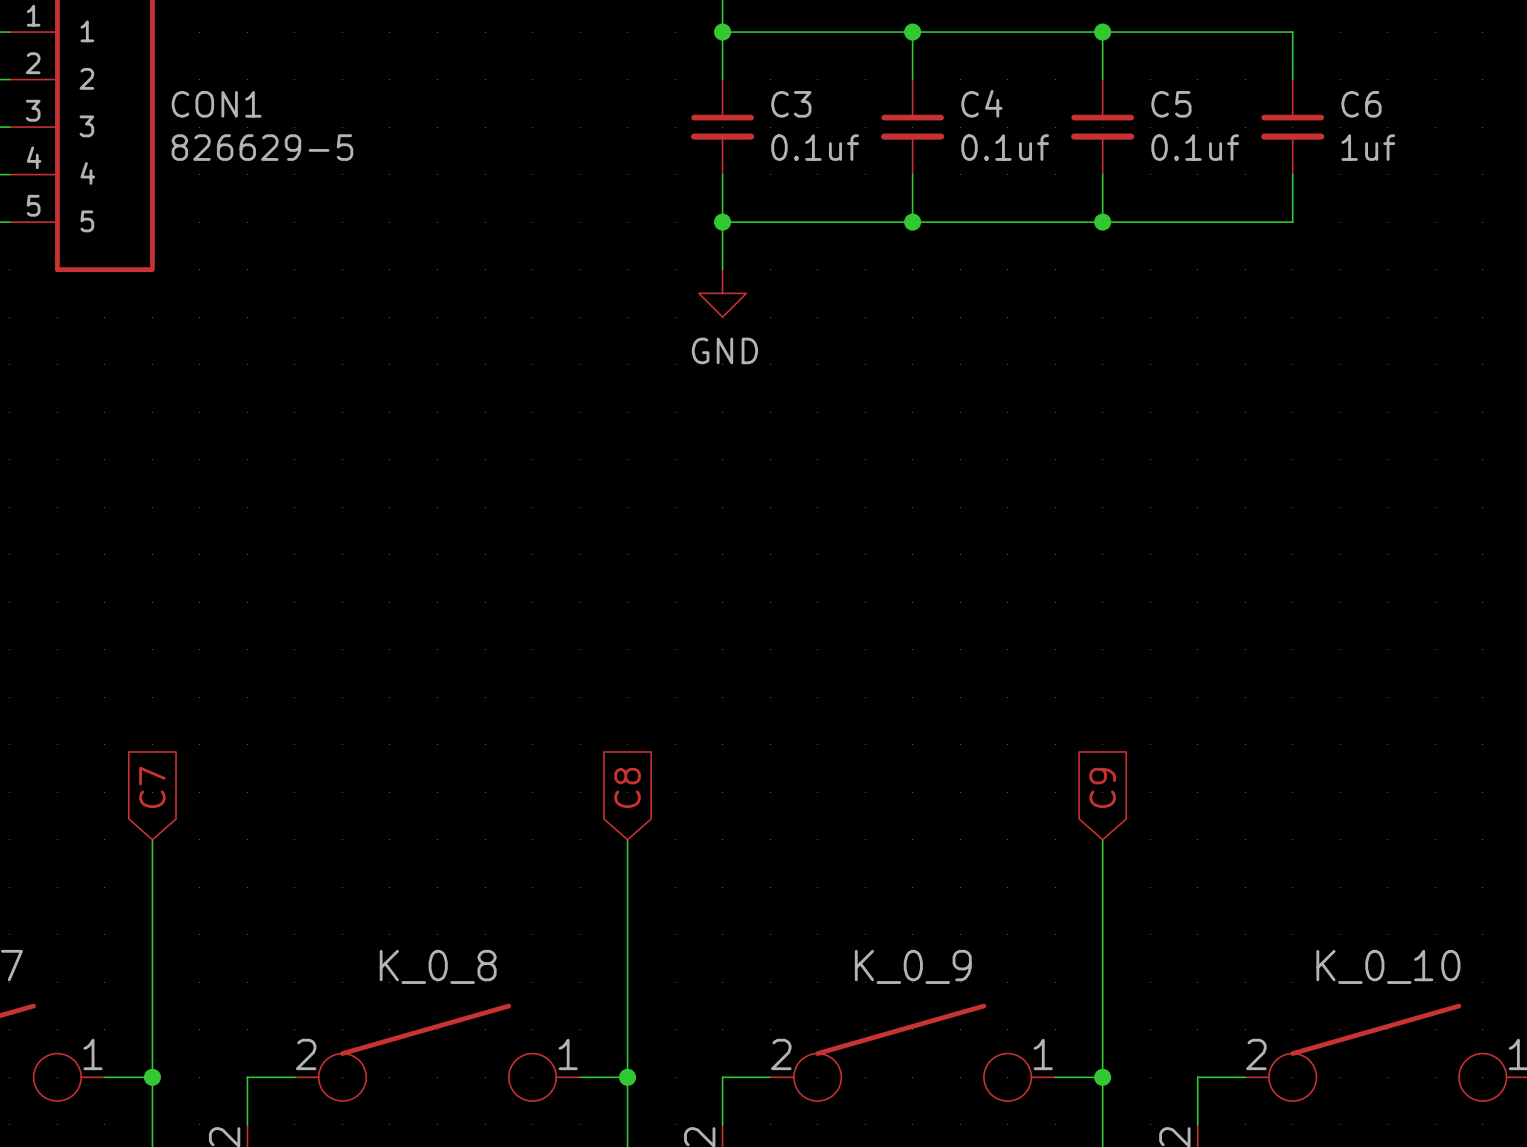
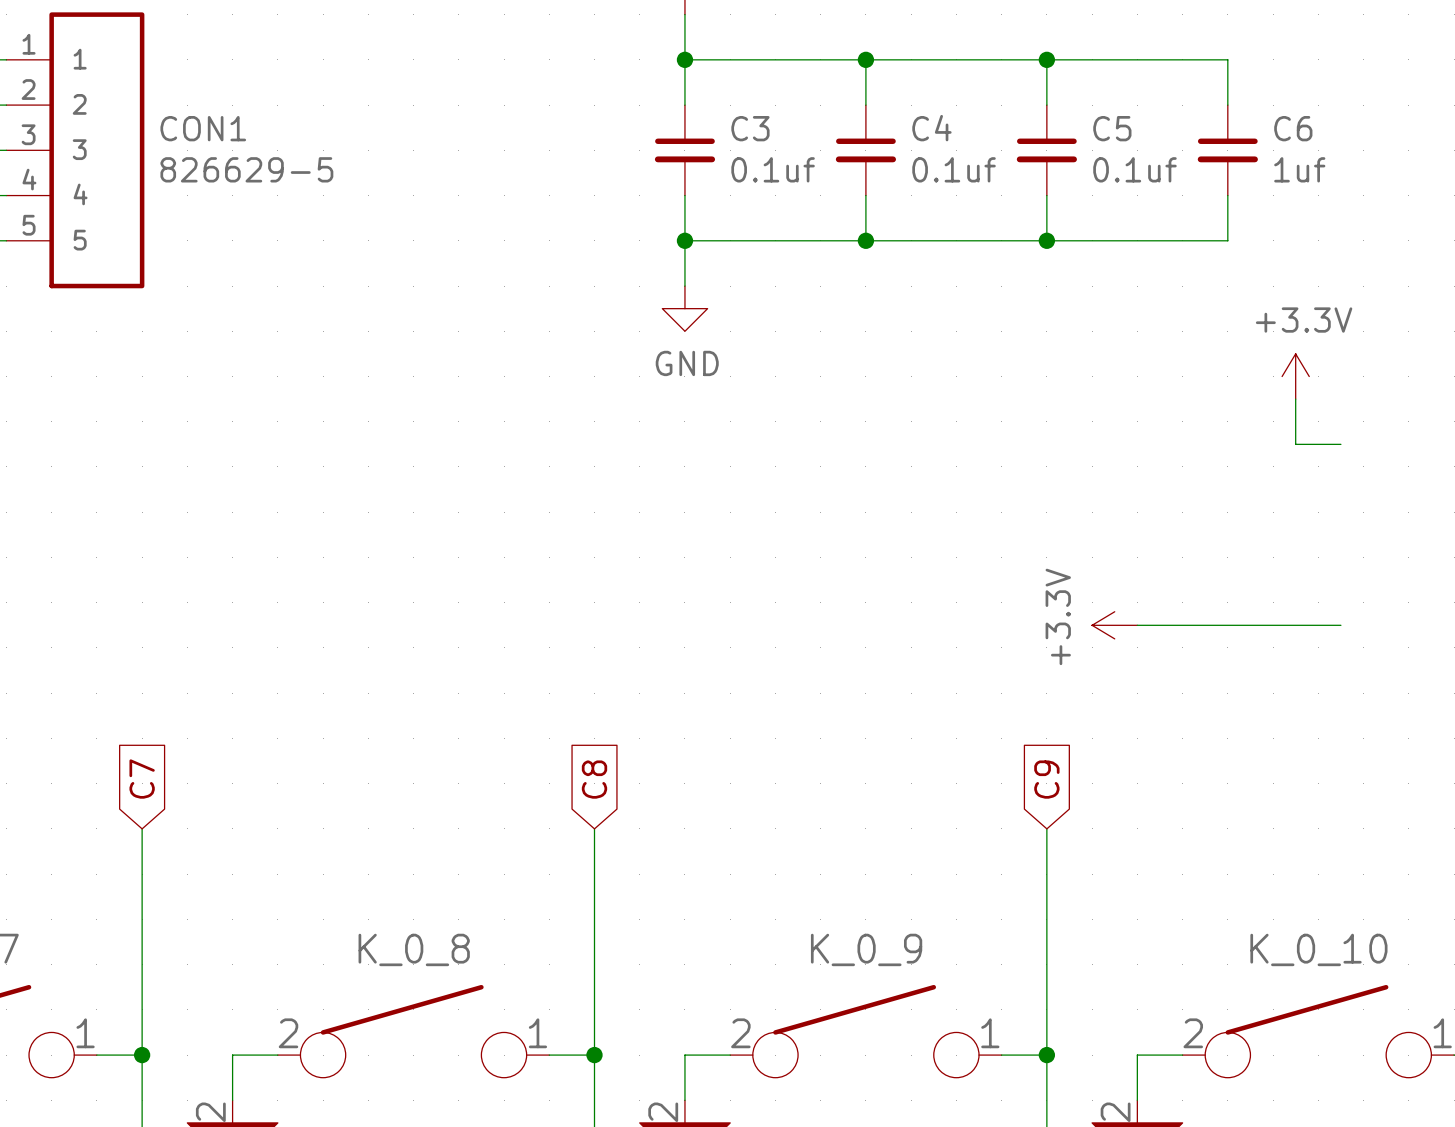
power symbol: none -> +3.3V (1295, 376)
wire: none -> (1295, 399) (1295, 444) (1340, 444)
power symbol: none -> +3.3V (1114, 625)
wire: none -> (1137, 625) (1340, 625)

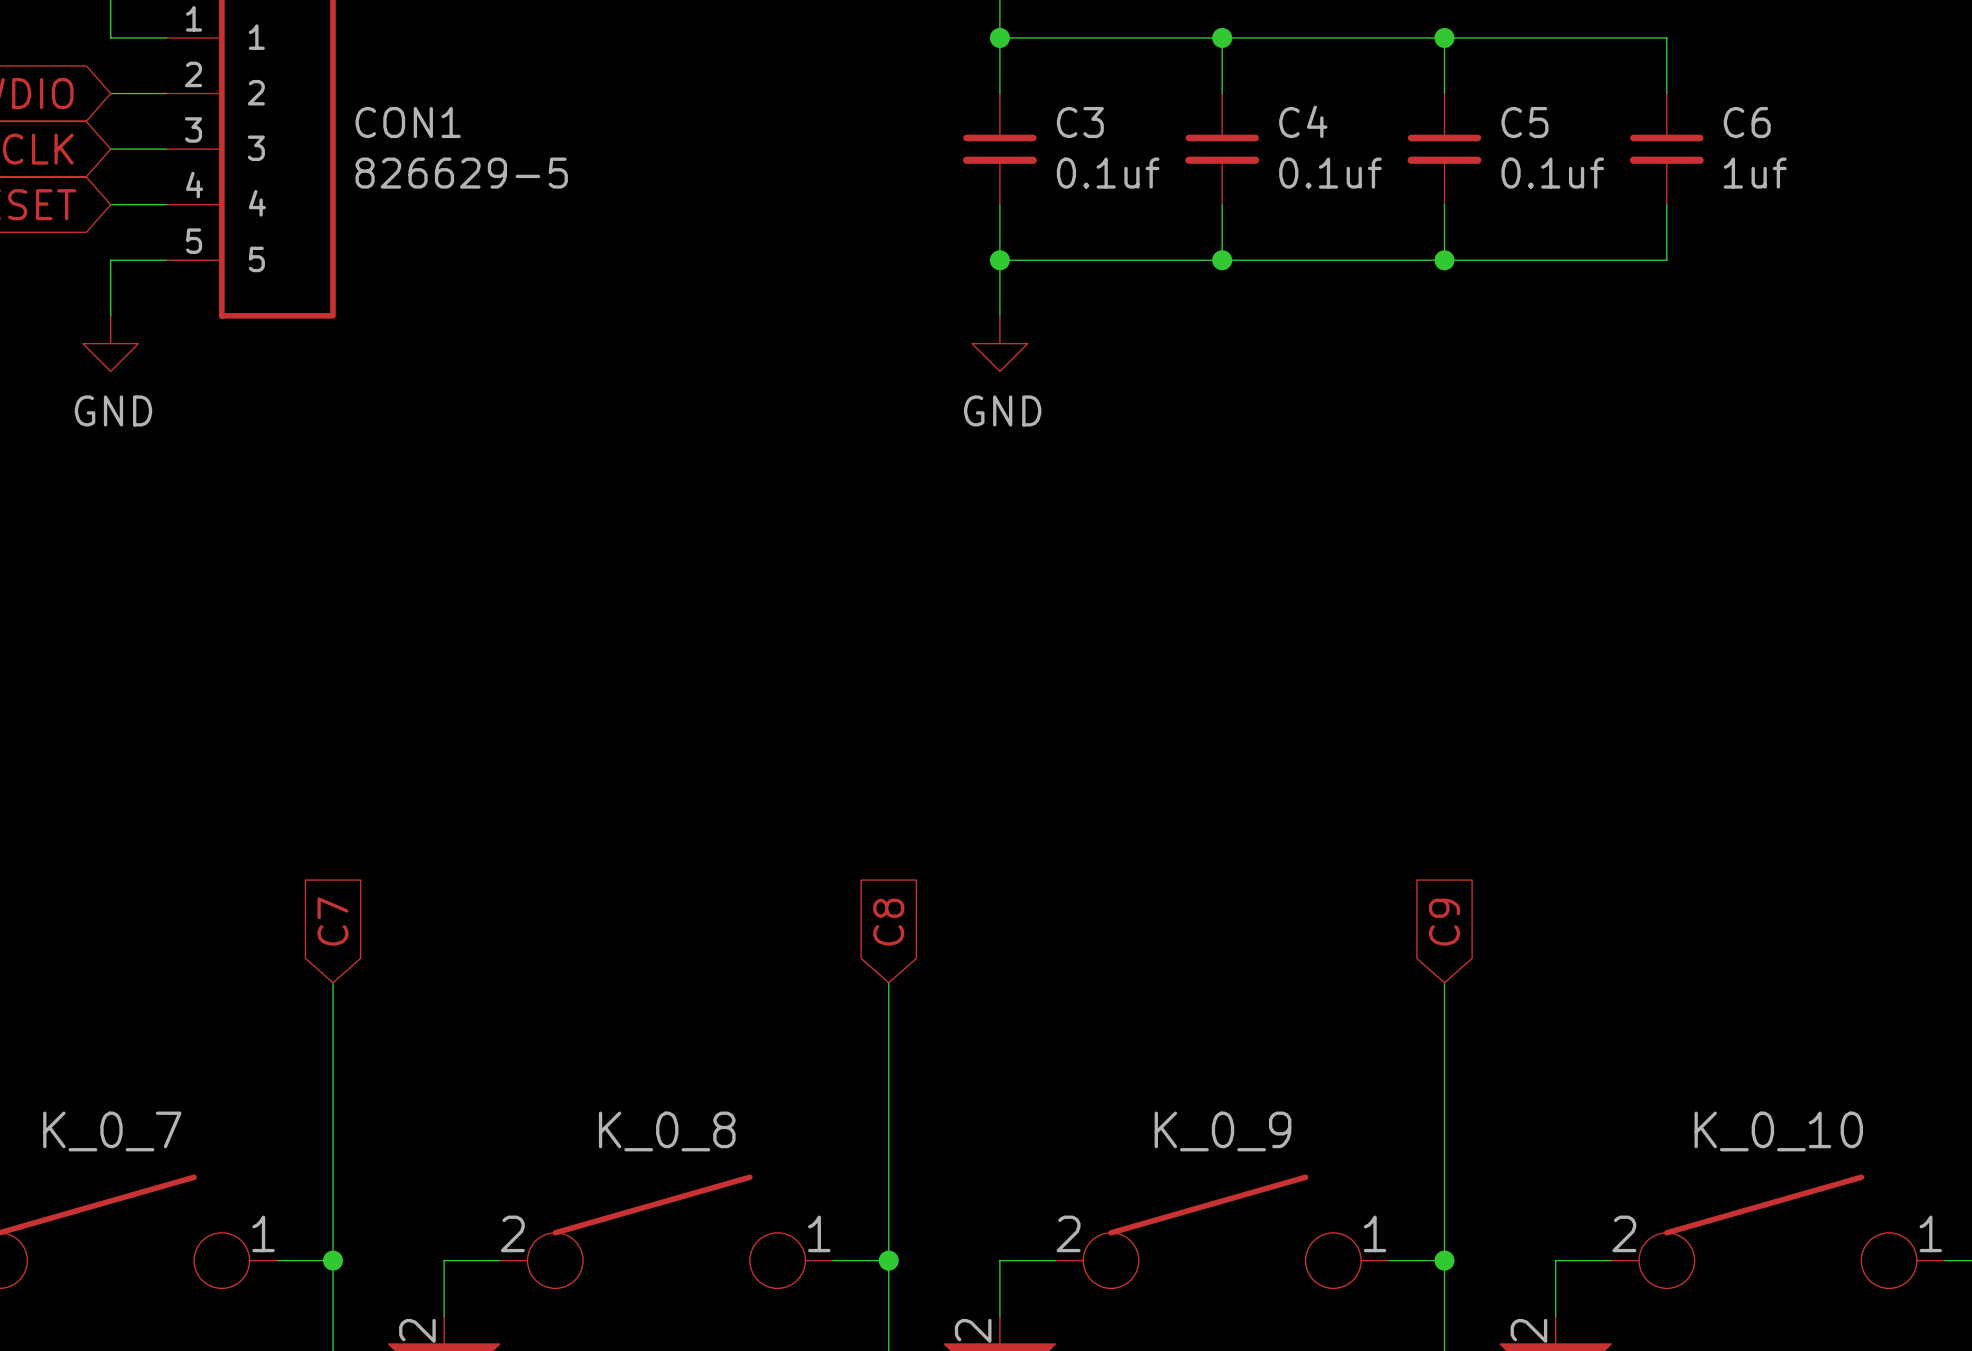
power symbol: +3.3V (1295, 376) -> none
wire: (1295, 399) (1295, 444) (1340, 444) -> none
power symbol: +3.3V (1114, 625) -> none
wire: (1137, 625) (1340, 625) -> none

